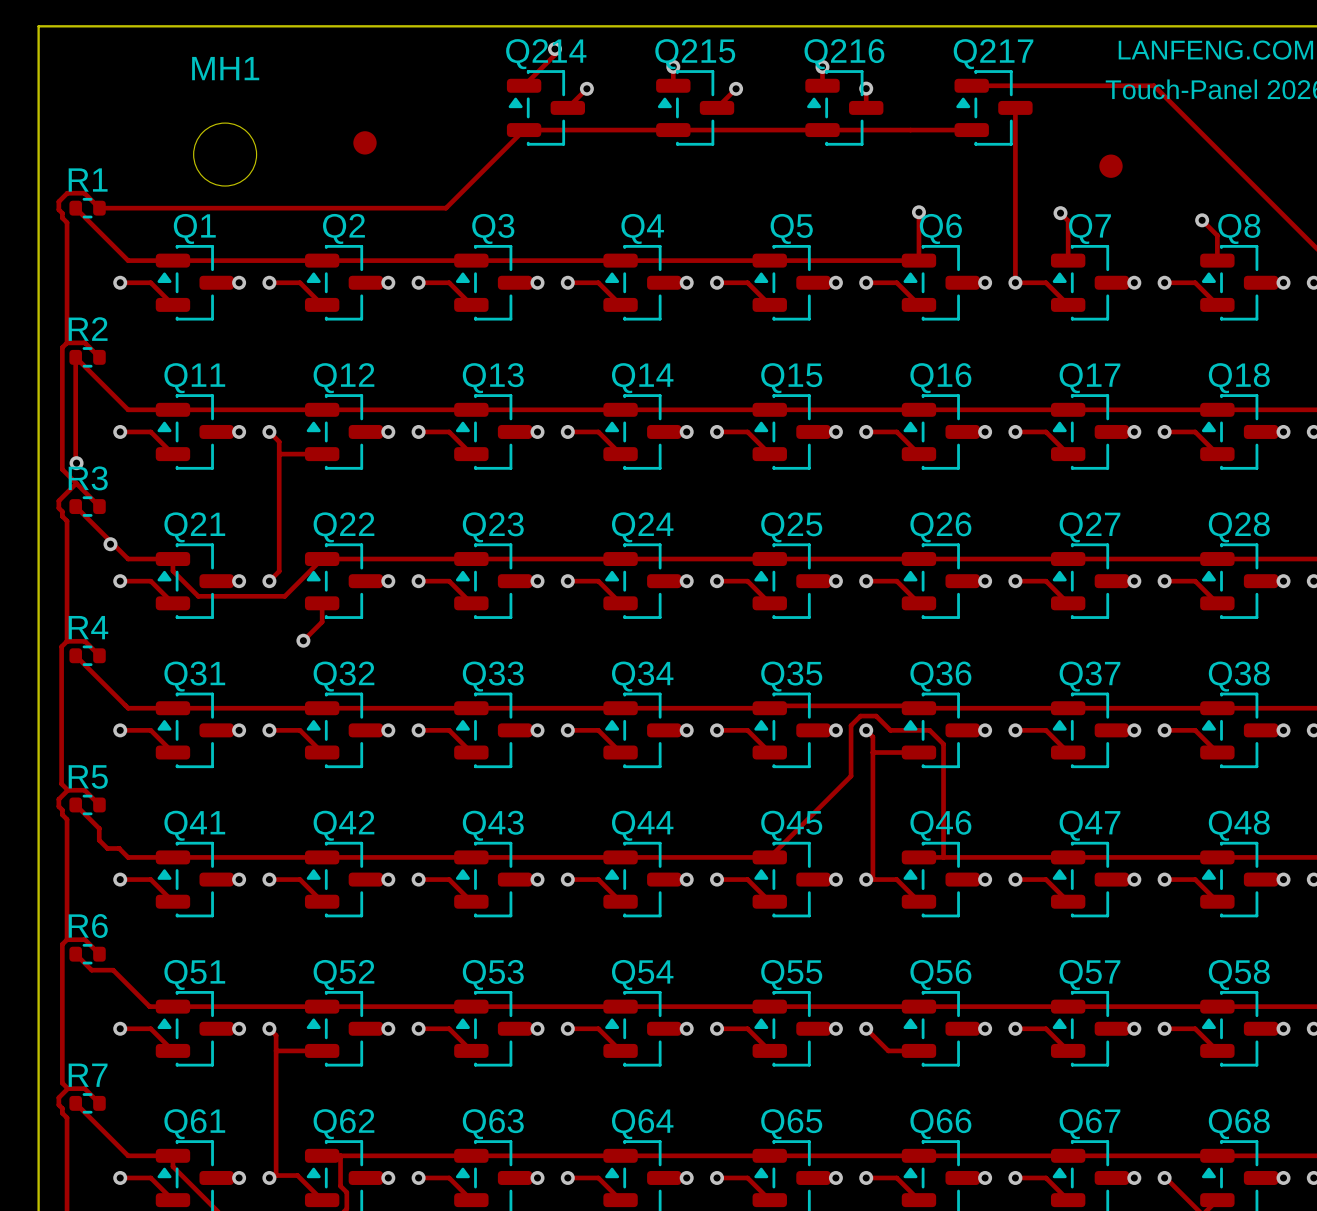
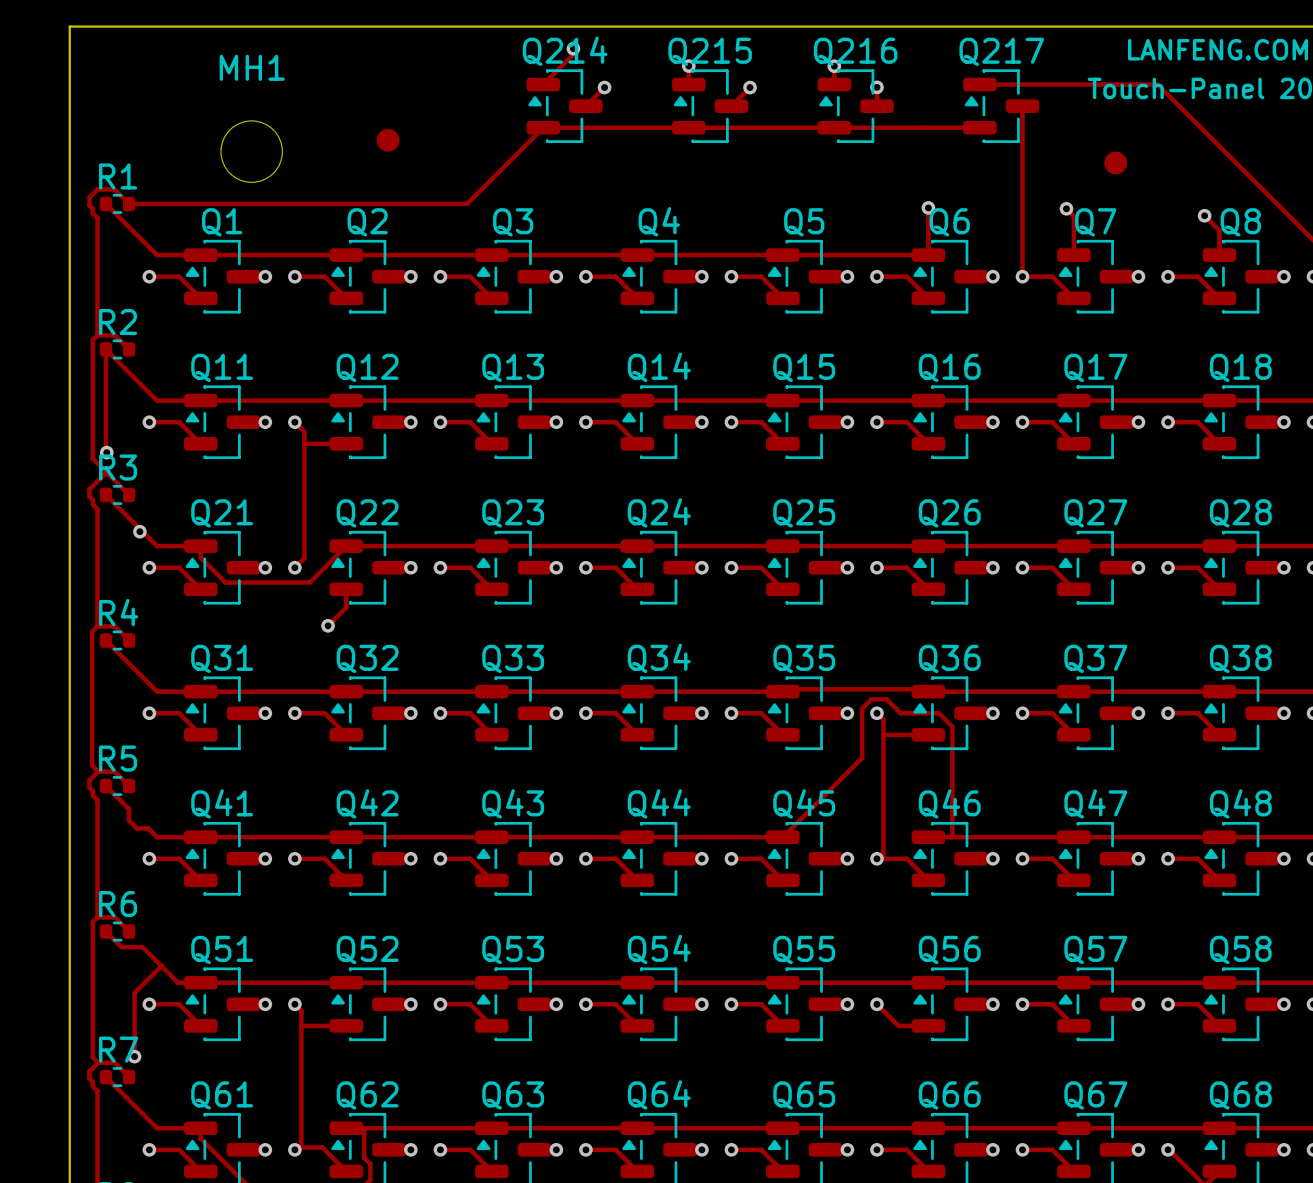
track: none -> (161, 965) (134, 992) (134, 1056)
via: none -> (134, 1056)

